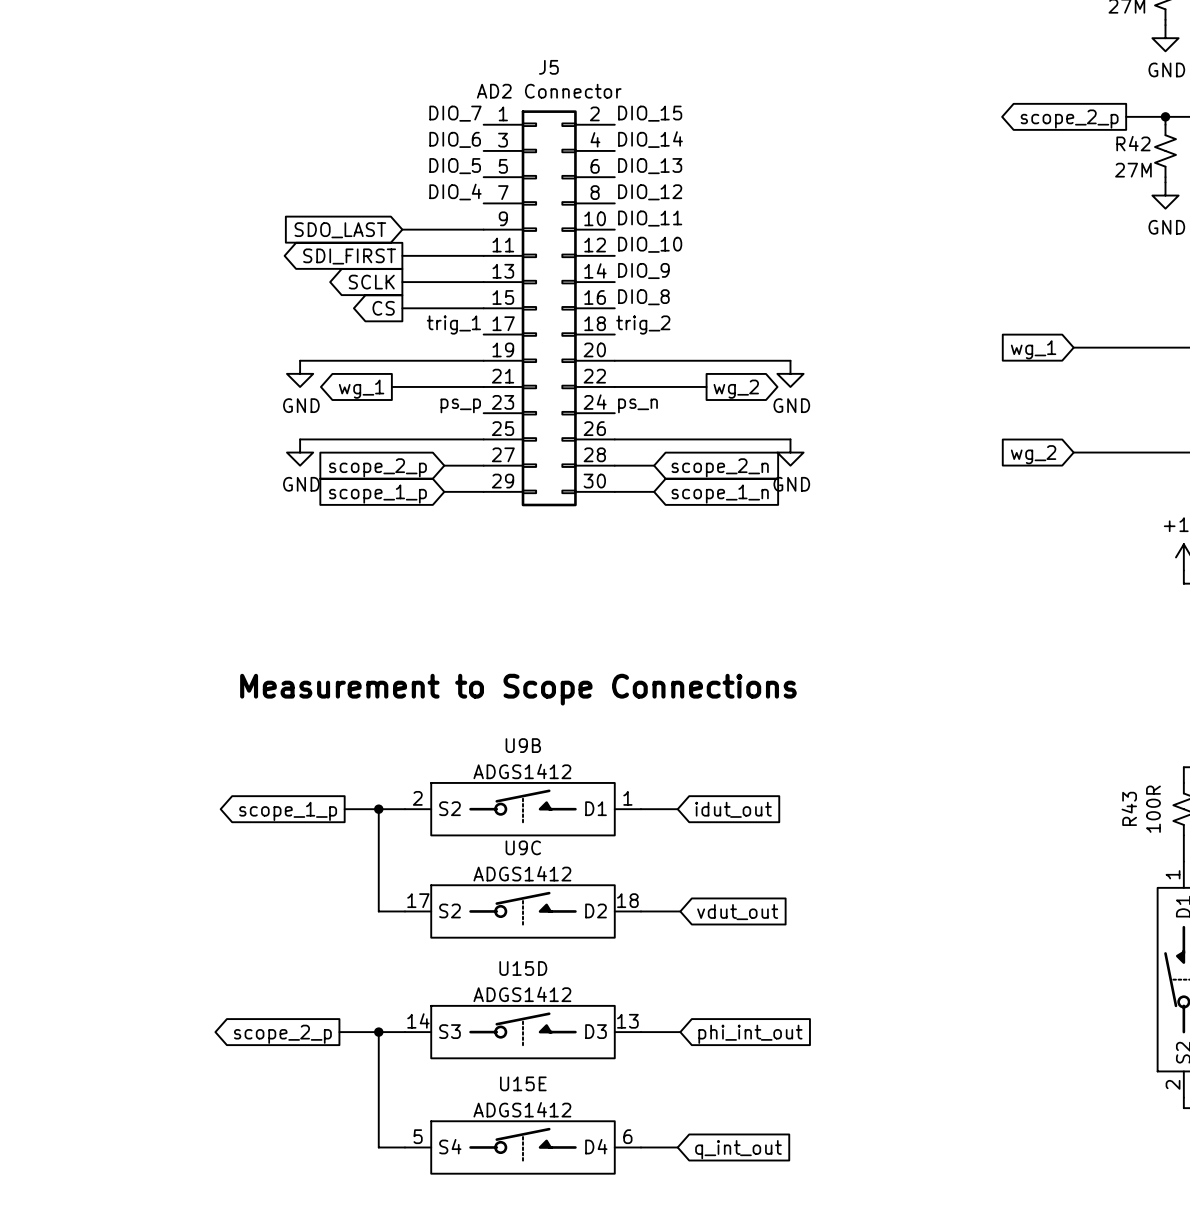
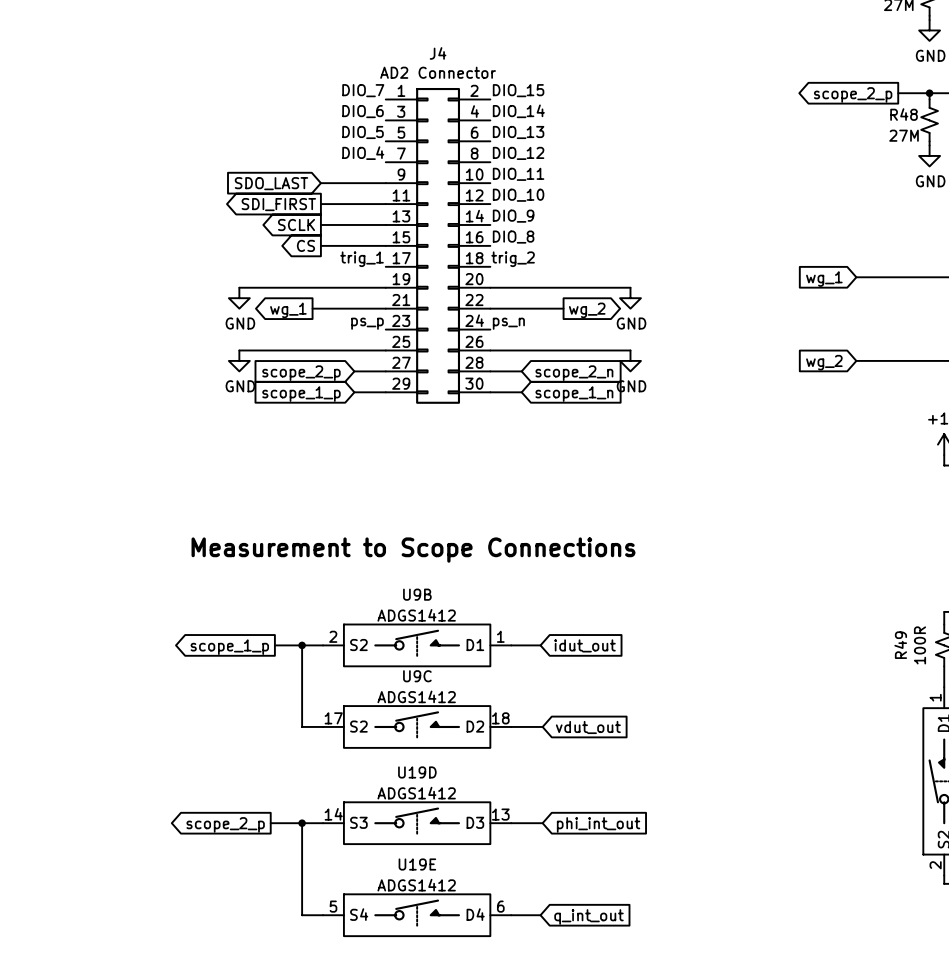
J5 name: J5 (548, 67) -> J4 (438, 53)
R42 name: R42 (1133, 143) -> R48 (904, 114)
R43 name: R43 (1129, 808) -> R49 (900, 645)
U15D name: U15D (523, 968) -> U19D (417, 772)
U15E name: U15E (523, 1083) -> U19E (417, 864)

